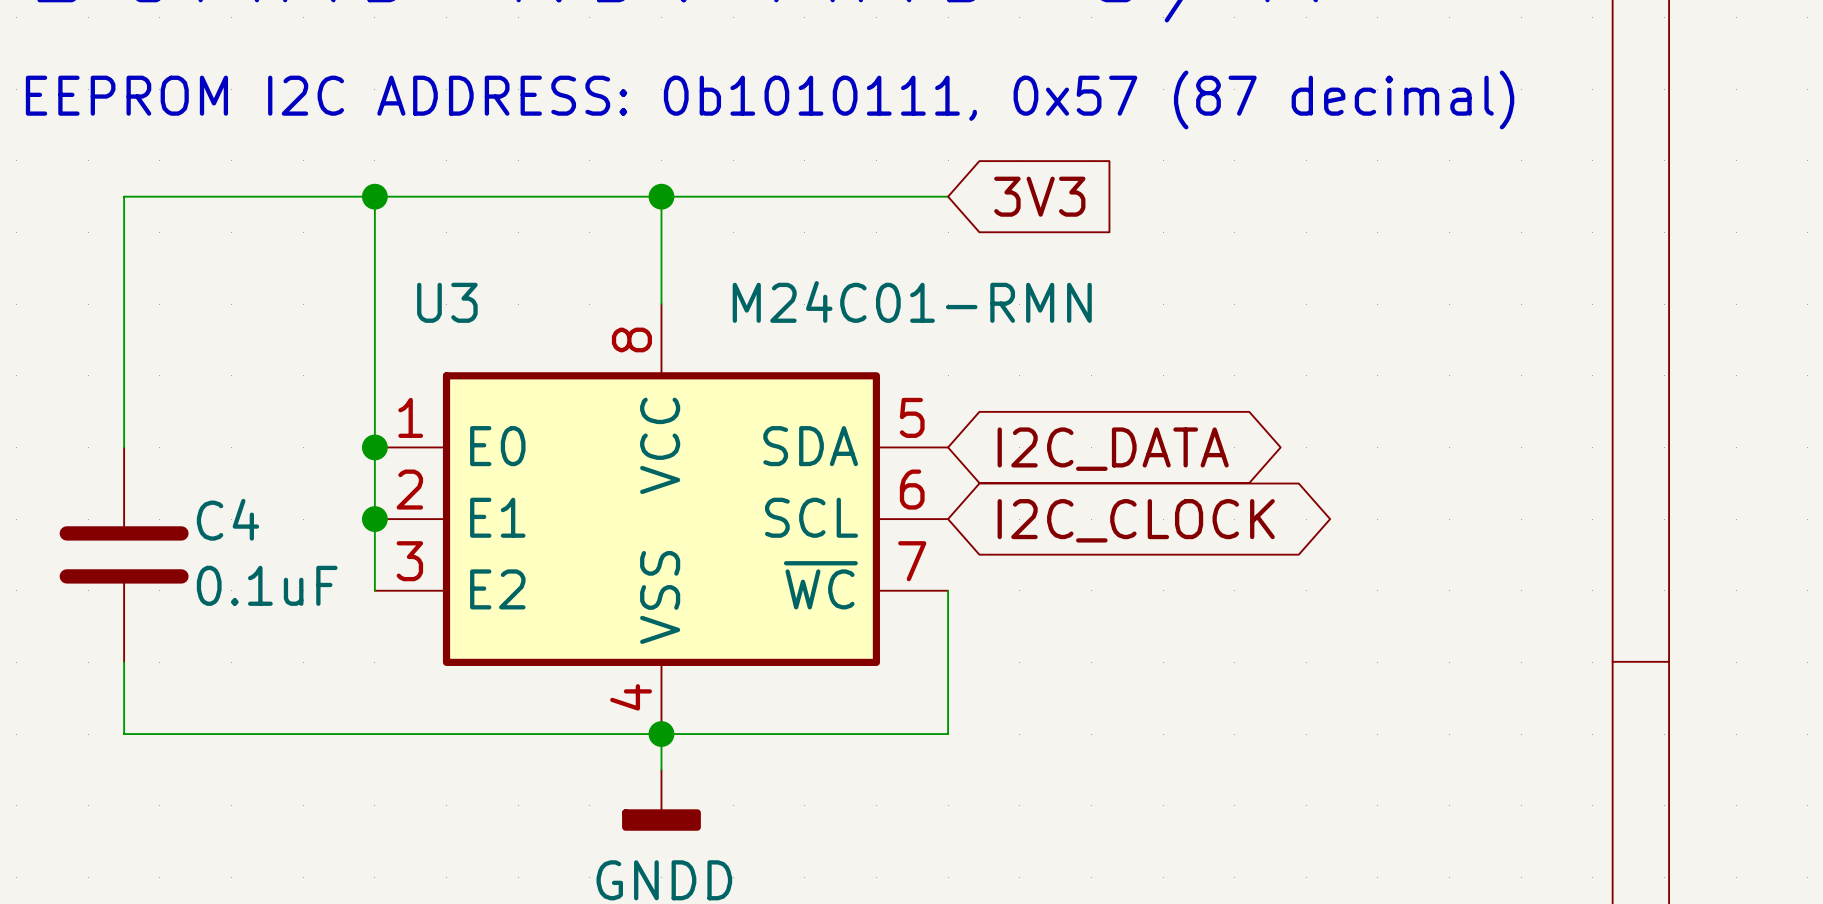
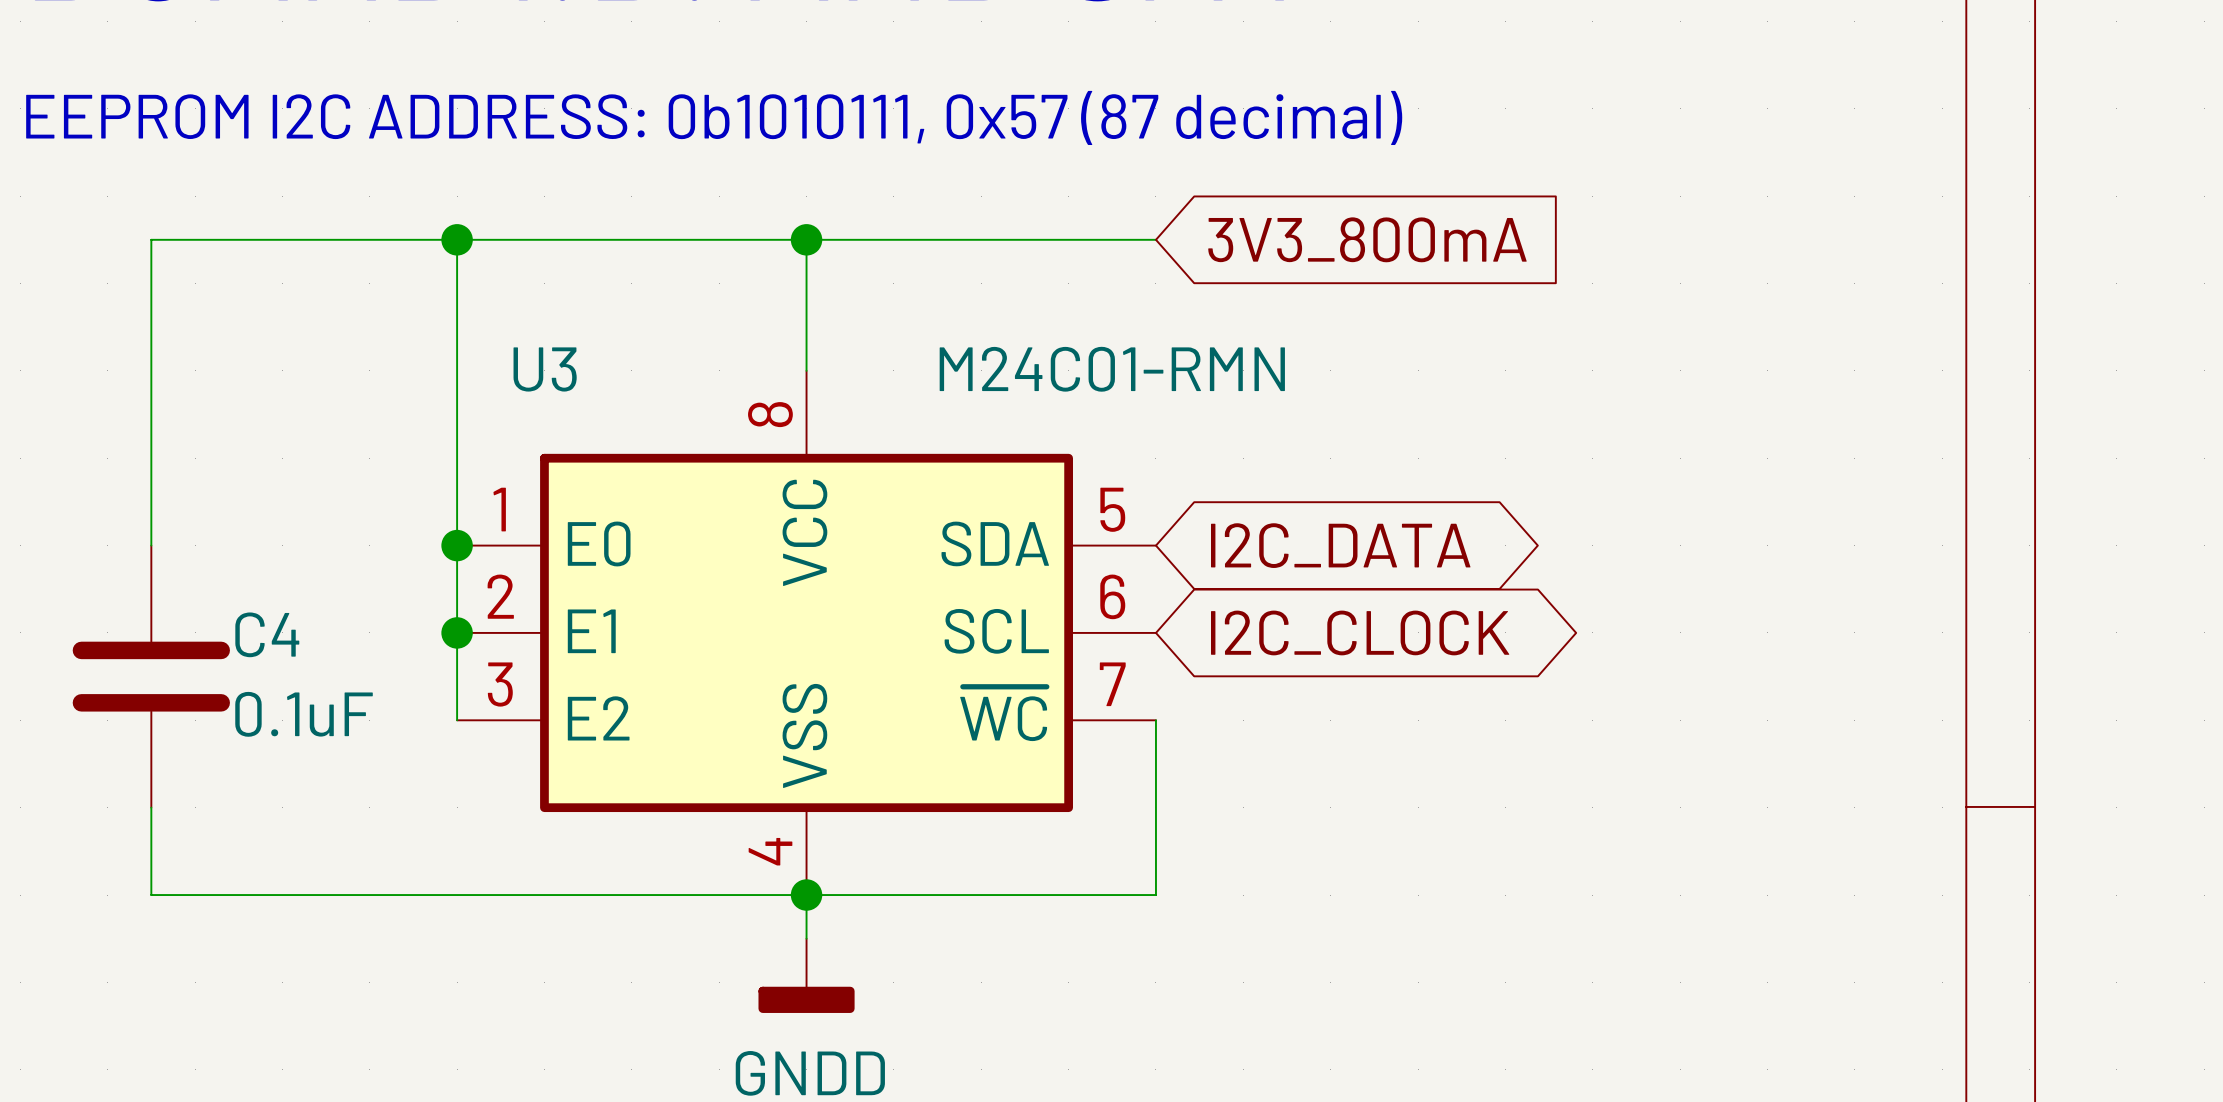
global label: 3V3 (1039, 196) -> 3V3_800mA (1367, 239)

